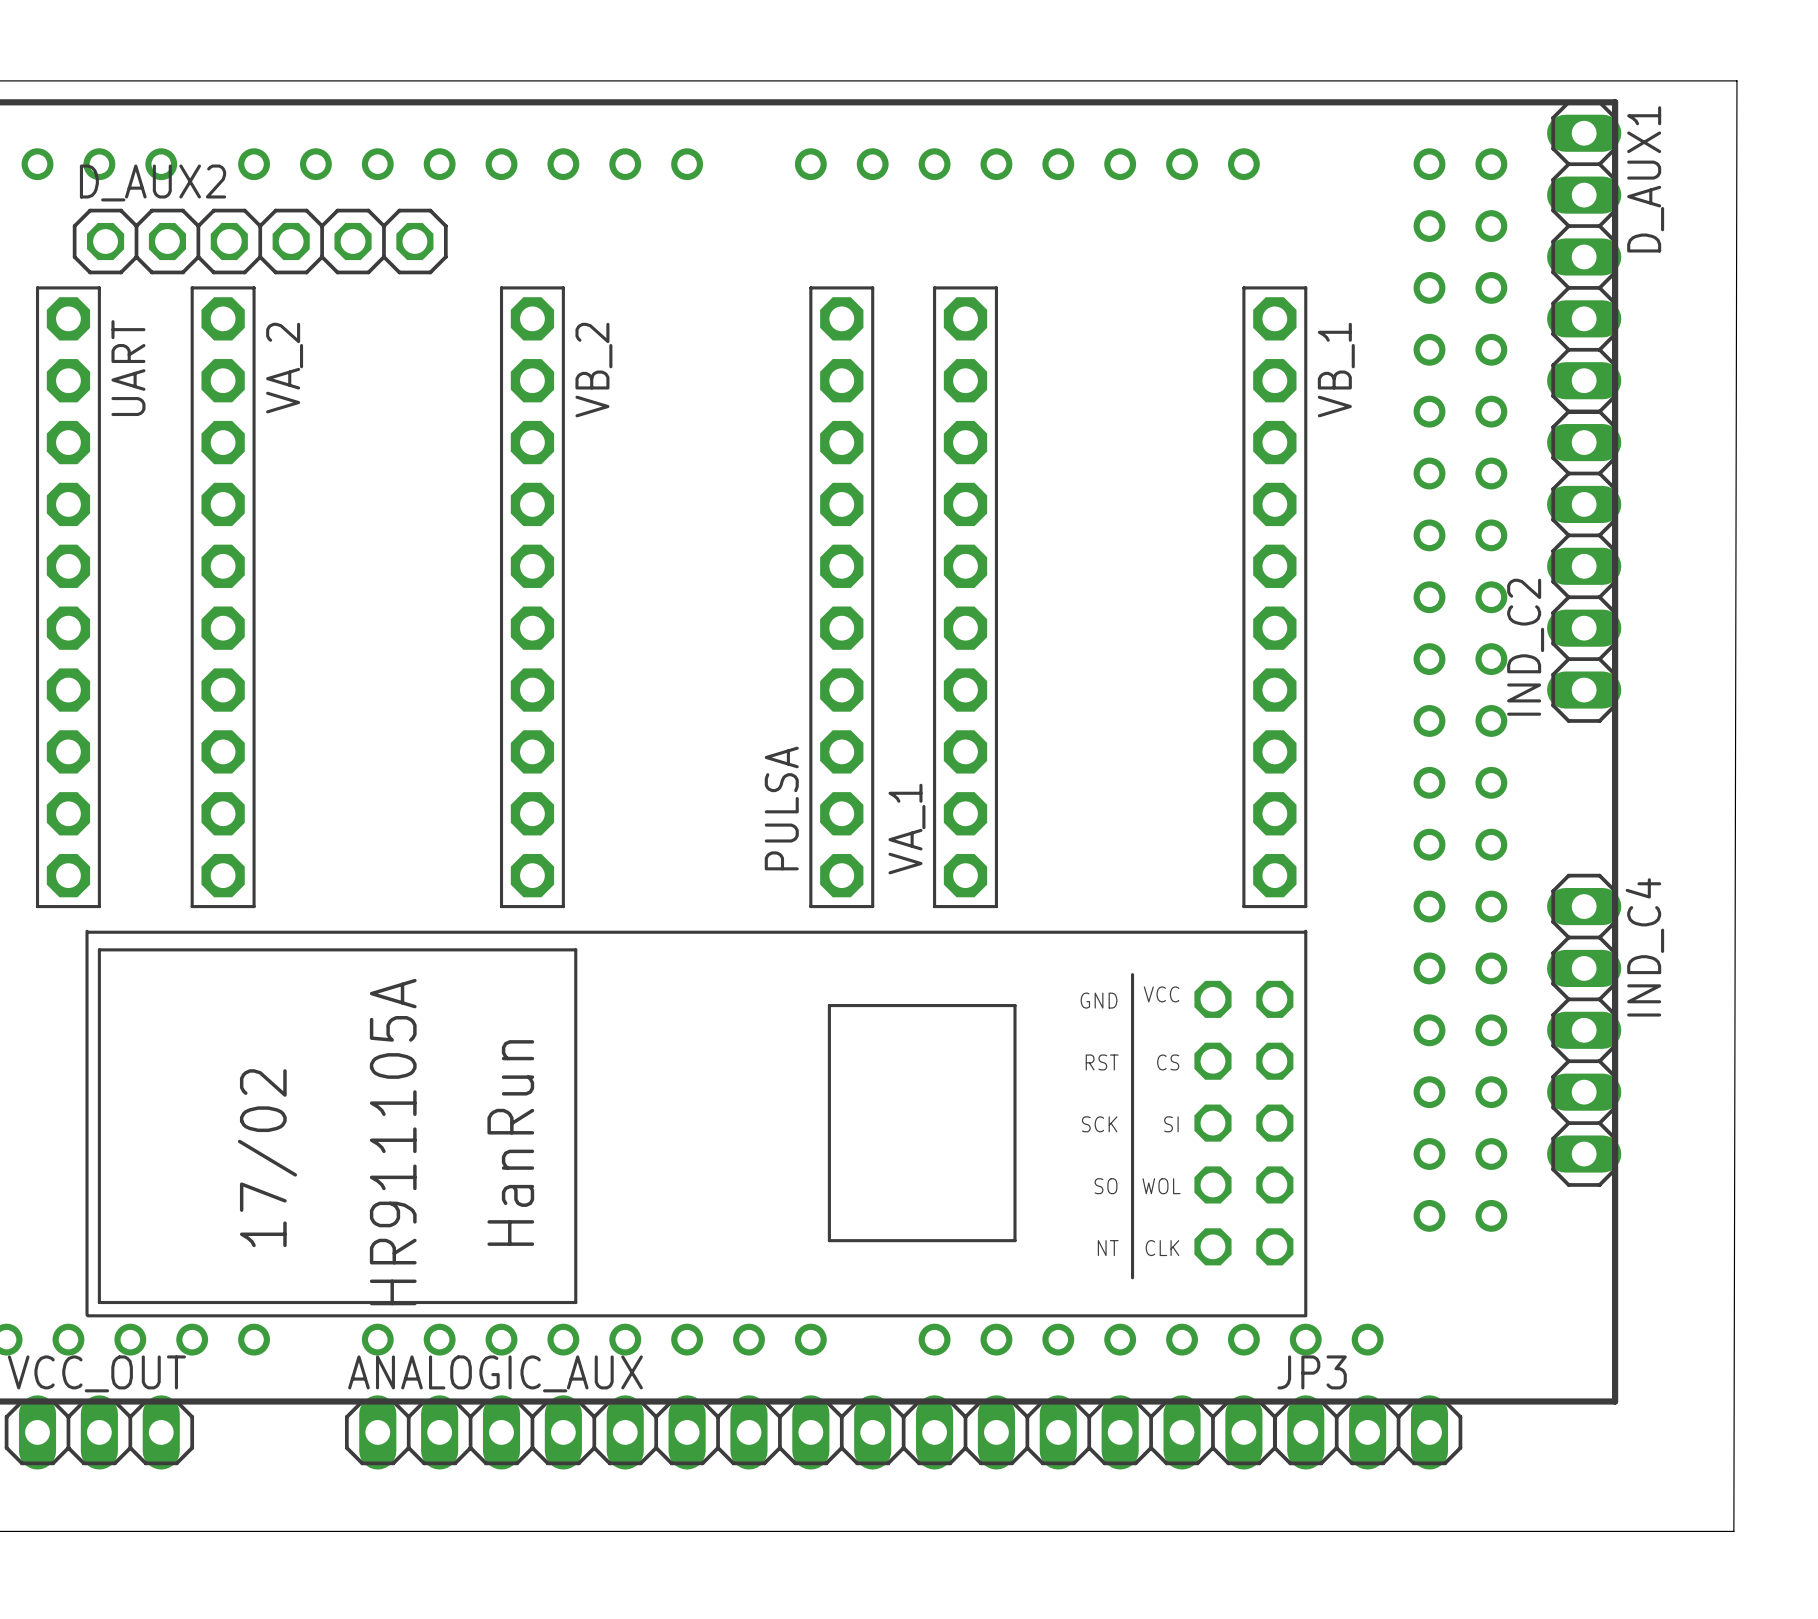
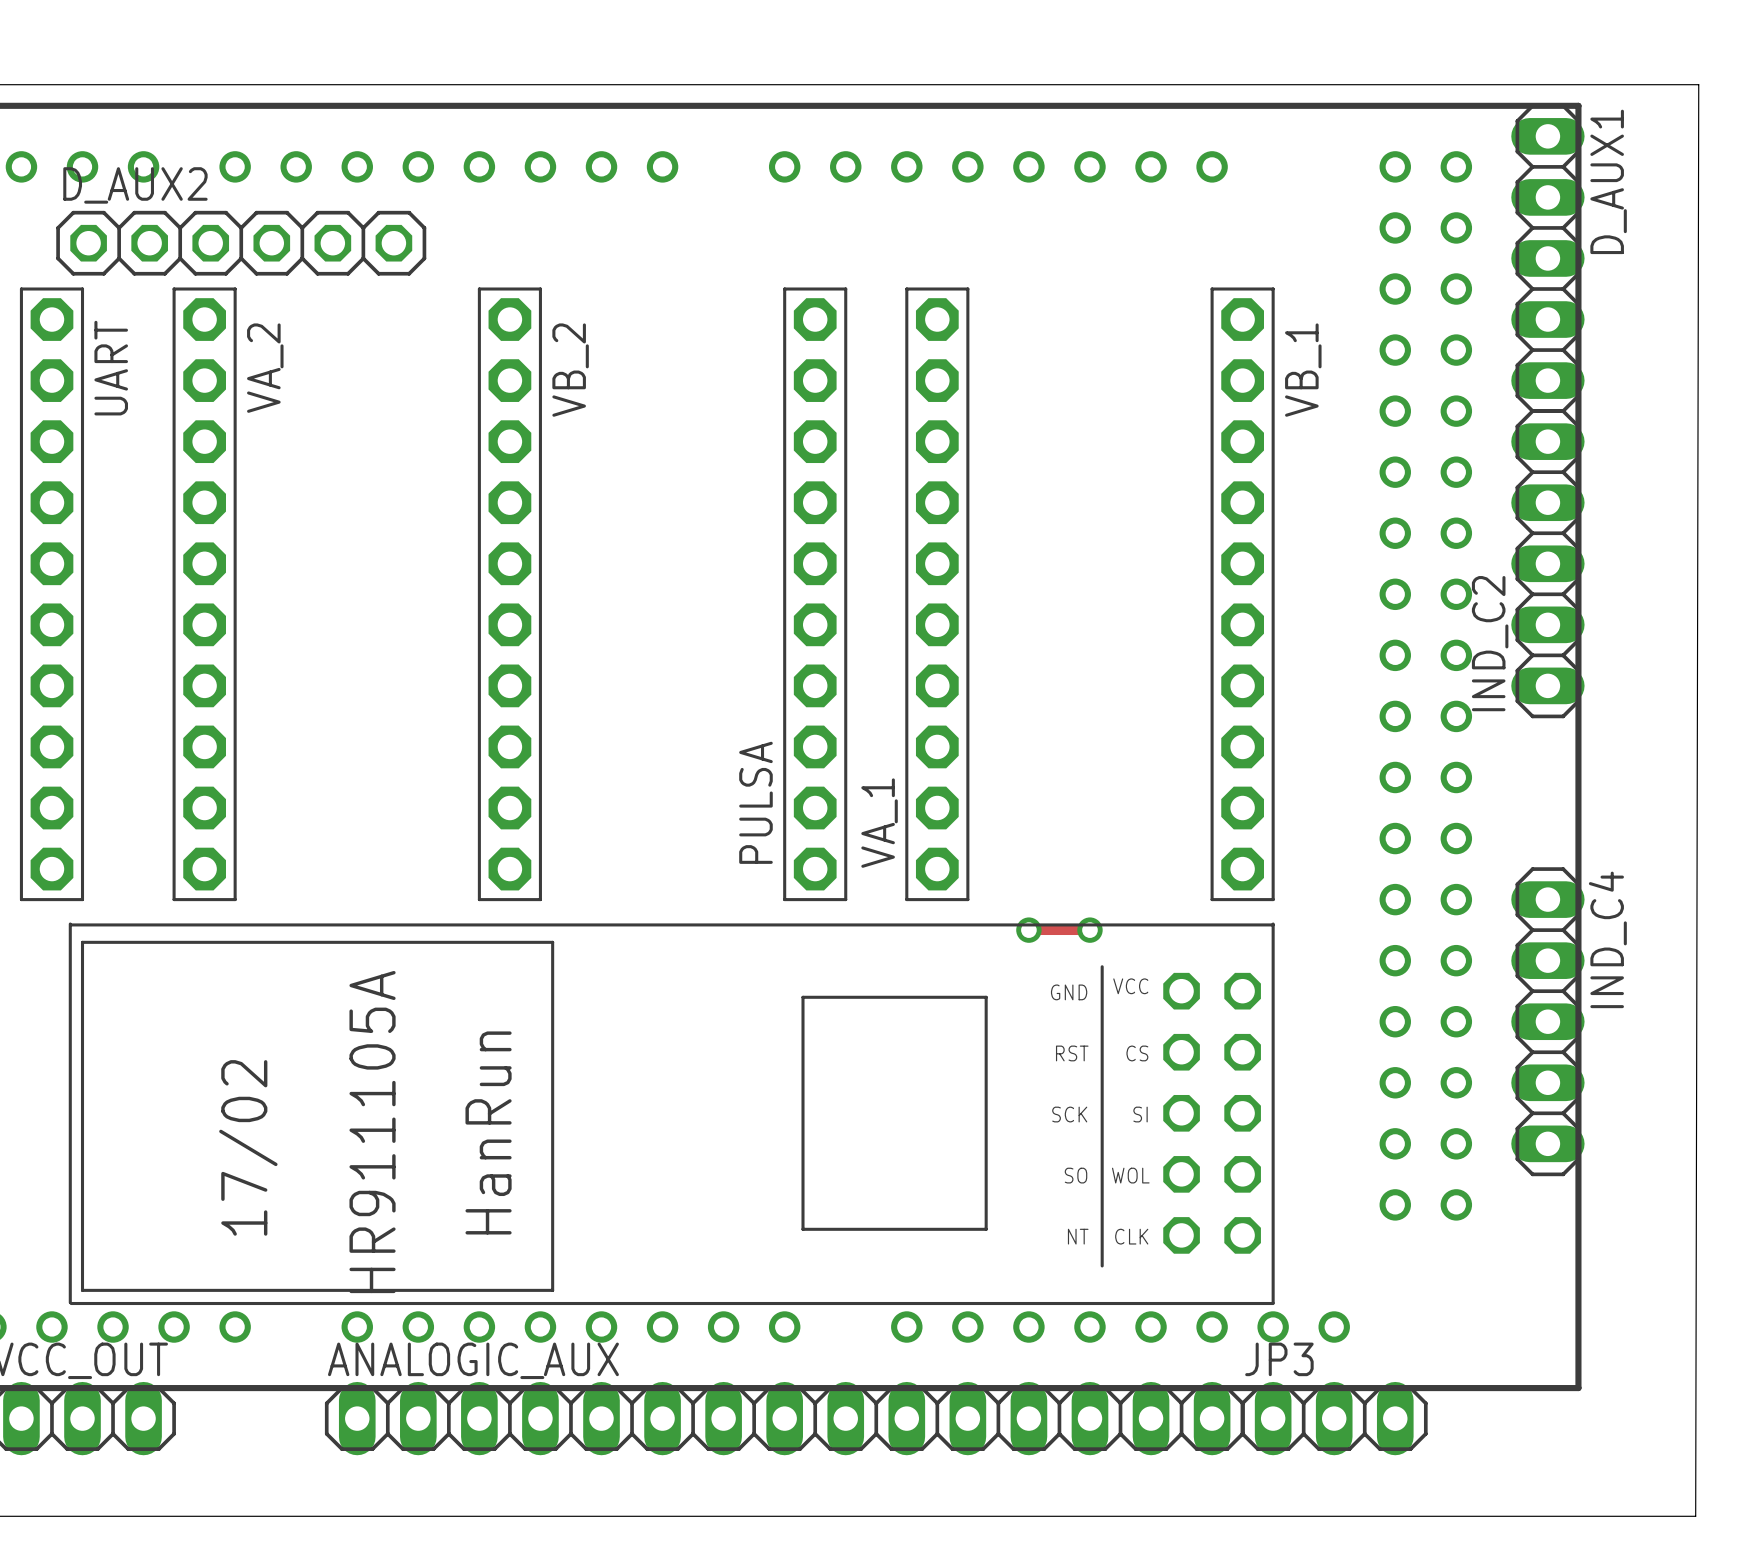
track: none -> (1028, 930) (1089, 930)
via: none -> (1028, 930)
via: none -> (1089, 930)

